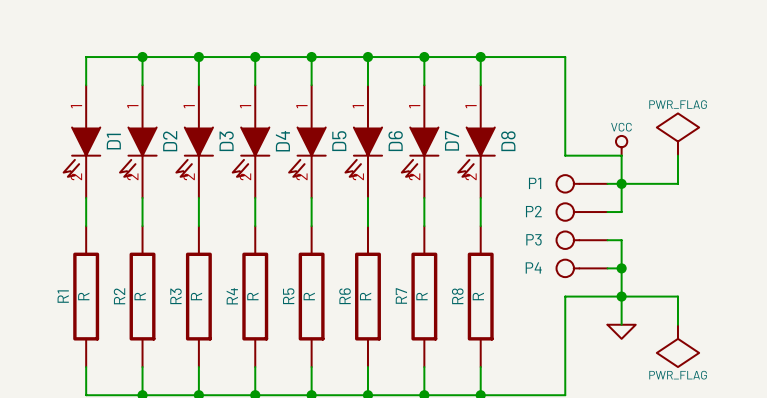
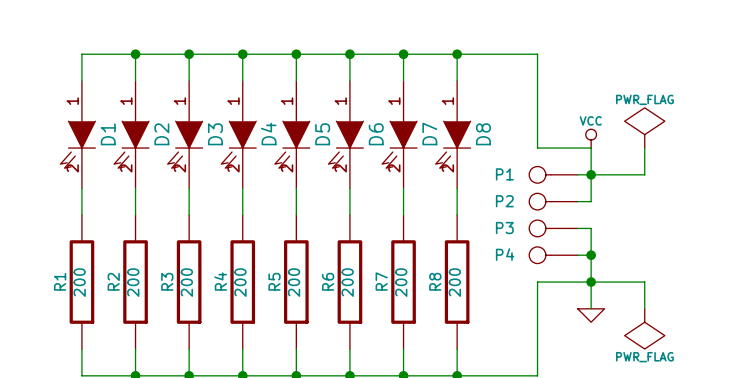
R1 value: R (83, 296) -> 200 (79, 282)
R2 value: R (140, 296) -> 200 (133, 282)
R3 value: R (196, 296) -> 200 (186, 282)
R4 value: R (252, 296) -> 200 (240, 282)
R5 value: R (309, 296) -> 200 (294, 282)
R6 value: R (365, 296) -> 200 (347, 282)
R7 value: R (421, 296) -> 200 (401, 282)
R8 value: R (478, 296) -> 200 (454, 282)

